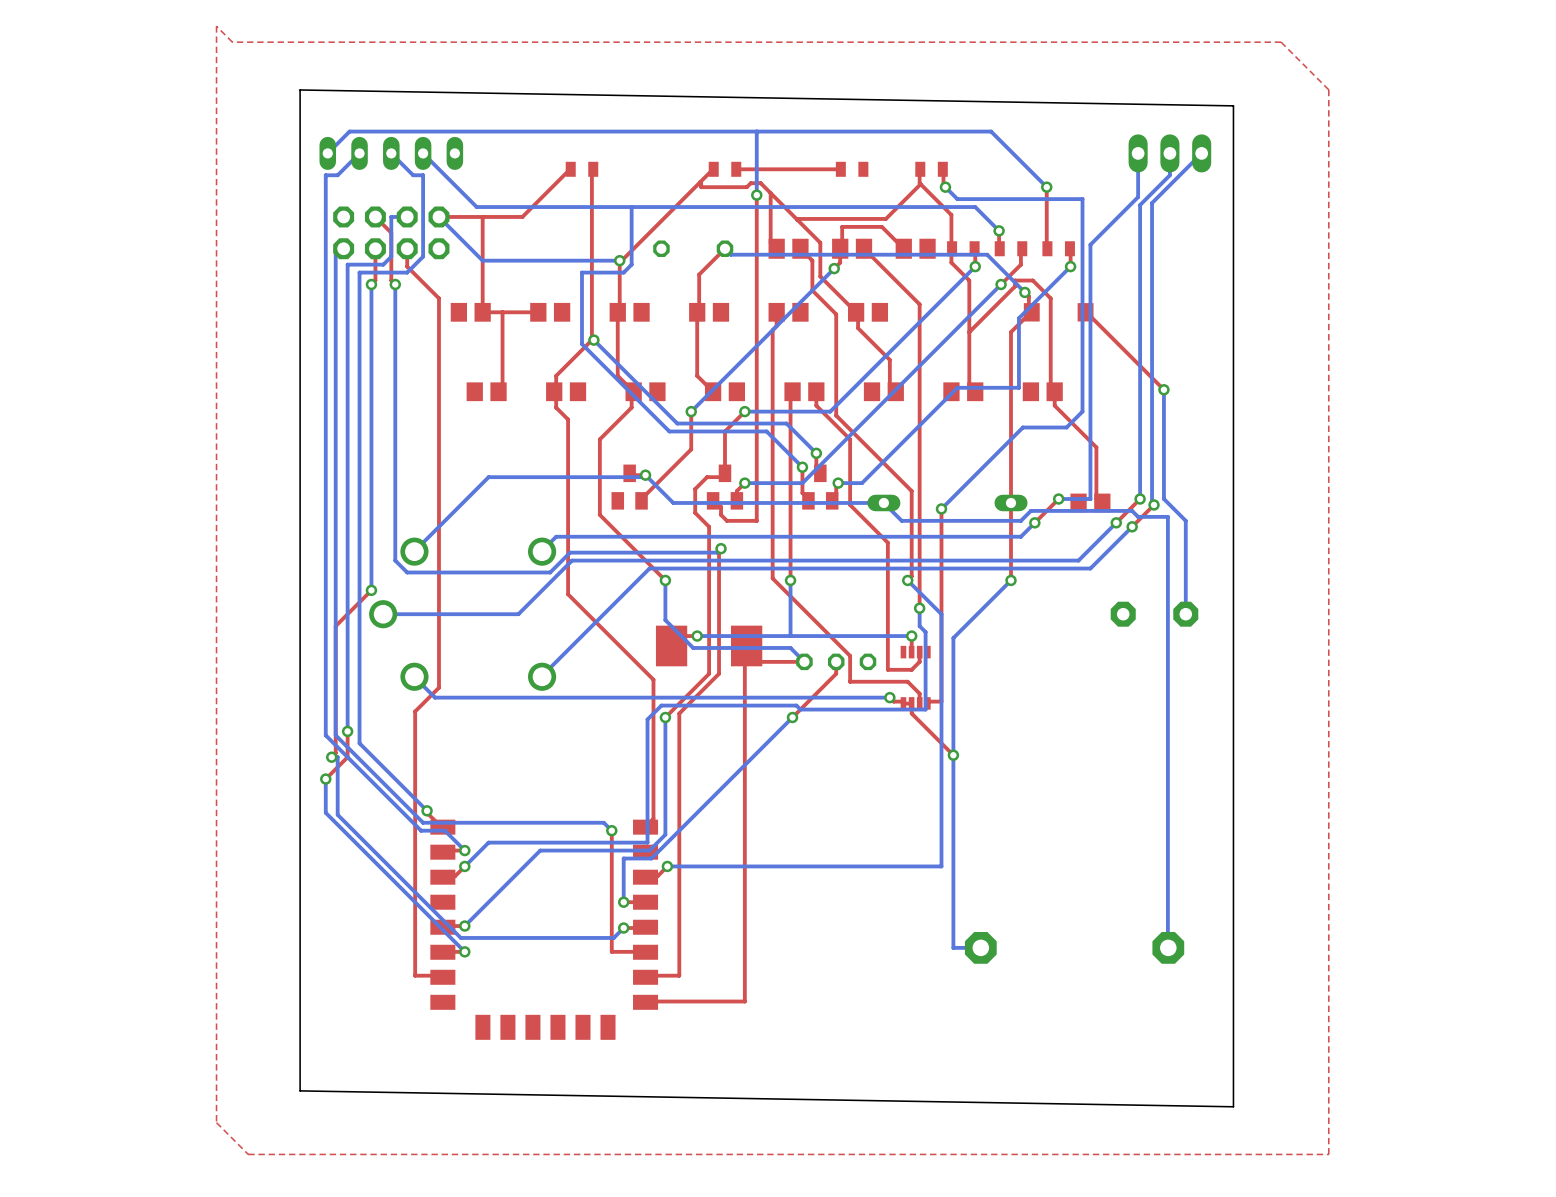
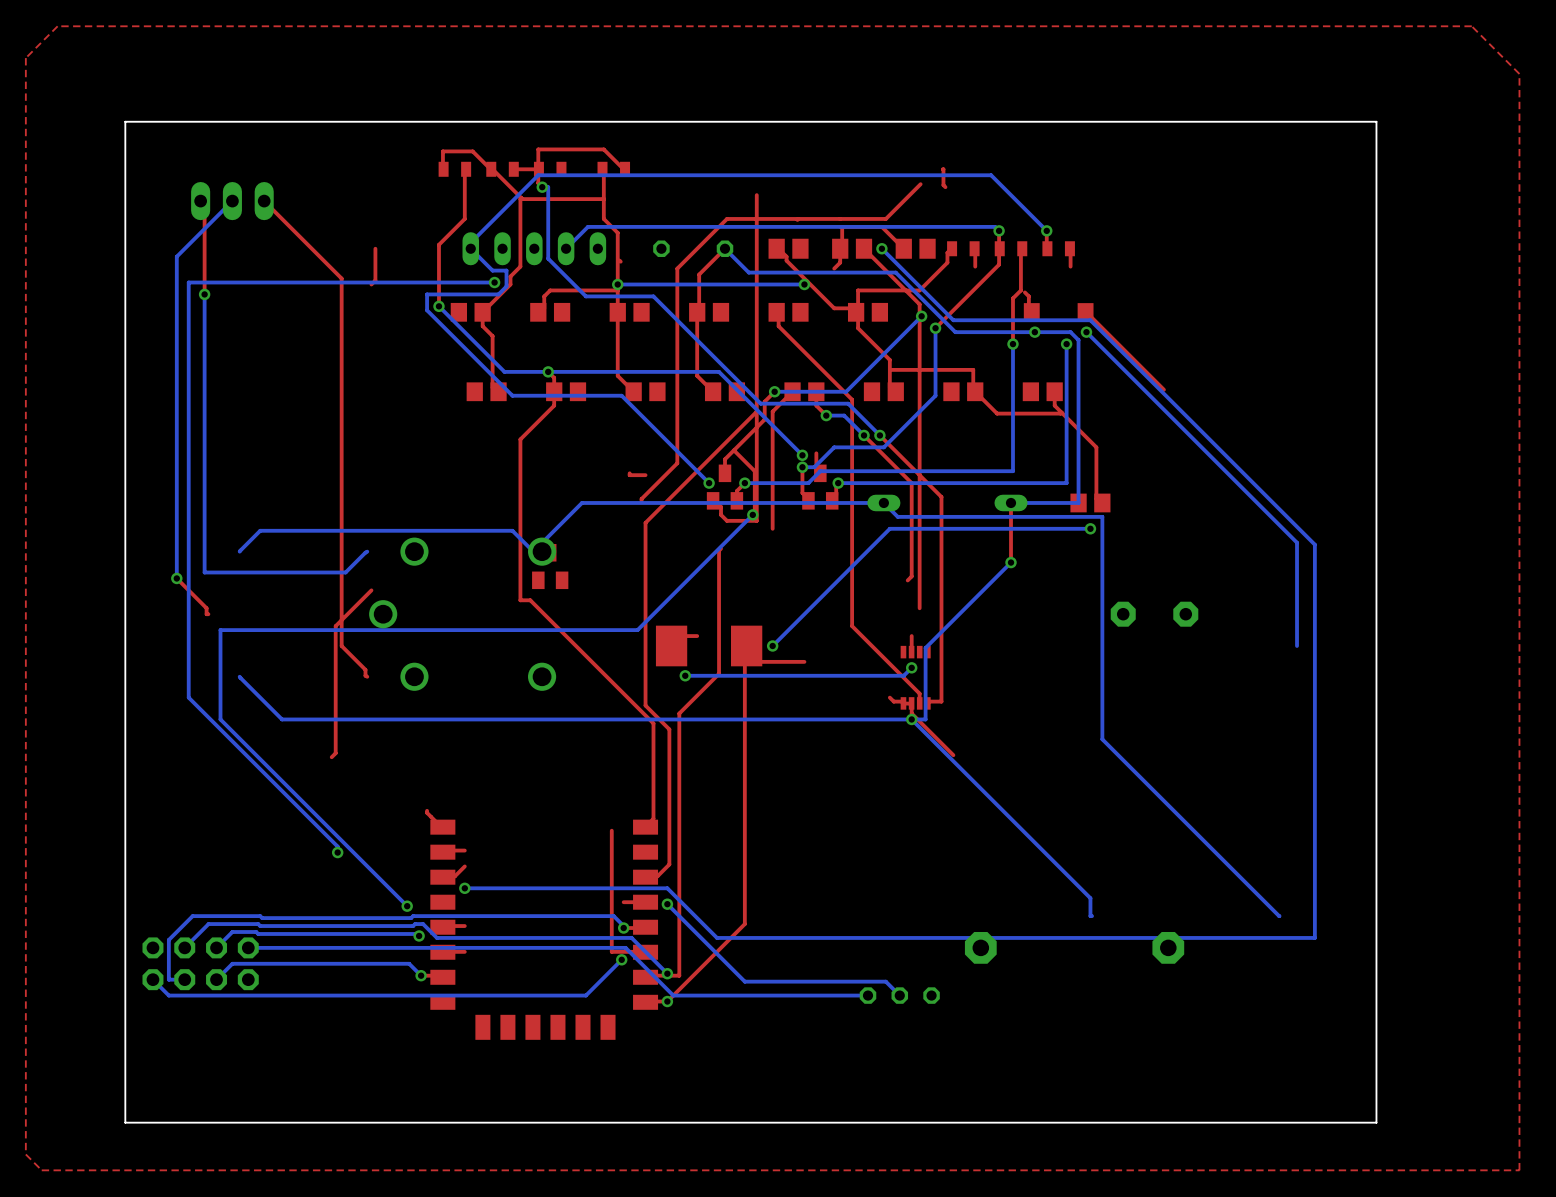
top zone outline: (216, 26) (232, 42) (1281, 42) (1328, 89) (1328, 1154) (248, 1154) (216, 1122) (216, 26) -> (1471, 26) (1519, 73) (1519, 1170) (41, 1170) (25, 1154) (25, 58) (57, 26) (1471, 26)
board edge: (300, 89) (300, 1090) (1233, 1106) (1233, 105) (300, 89) -> (1376, 121) (1376, 1122) (125, 1122) (125, 121) (1376, 121)
bottom track: (756, 131) (756, 195) -> none
bottom track: (327, 153) (349, 131) (991, 131) (1046, 187) -> none
bottom track: (359, 153) (337, 175) (325, 175) (325, 735) (421, 830) (444, 830) (464, 850) -> none
bottom track: (391, 153) (413, 175) (423, 175) (423, 256) (407, 272) (359, 272) (359, 743) (427, 810) -> none
part position: (391, 153) -> (534, 248)
bottom track: (423, 153) (476, 207) (975, 207) (995, 226) -> (566, 248) (587, 226) (995, 226)
bottom track: (1138, 153) (1138, 197) (1090, 244) (1090, 499) (1058, 499) -> none
bottom track: (1169, 153) (1169, 175) (1140, 205) (1140, 499) -> none
part: (1169, 153) -> none
bottom track: (1201, 153) (1152, 203) (1152, 504) (1154, 504) -> none
top track: none -> (443, 169) (442, 151) (472, 151) (522, 199) (603, 199)
part: none -> (454, 169)
part: none -> (502, 169)
top track: none -> (538, 169) (513, 169)
part: none -> (550, 169)
top track: (570, 169) (522, 216) (438, 216) -> none
part: (581, 169) -> none
top track: (593, 169) (591, 340) -> none
part: none -> (613, 169)
top track: none -> (625, 169) (603, 149) (538, 149) (538, 183) (542, 187)
top track: (713, 169) (619, 262) (619, 312) (617, 312) -> (602, 169) (603, 218) (617, 232) (617, 312)
part: (724, 169) -> none
top track: (840, 169) (736, 169) -> none
part: (852, 169) -> none
top track: (920, 169) (919, 183) (951, 214) (951, 262) (969, 280) (969, 387) (973, 391) -> (889, 369) (973, 369) (973, 391)
part: (931, 169) -> none
top track: (700, 182) (701, 187) (746, 187) (750, 183) (760, 183) (820, 242) (820, 276) (856, 312) -> (776, 248) (786, 256) (786, 260) (834, 308) (858, 308) (856, 312)
bottom track: none -> (542, 187) (548, 187) (548, 258) (585, 296) (653, 296) (760, 403) (848, 403) (879, 435)
via: none -> (542, 187)
bottom track: (945, 187) (957, 199) (1082, 199) (1082, 411) (1066, 427) (1022, 427) (941, 508) -> none
via: (945, 187) -> none
top track: (1046, 187) (1046, 230) -> none
via: (1046, 187) -> none
top track: (770, 193) (770, 242) (776, 248) -> none
via: (756, 195) -> none
top track: none -> (200, 201) (204, 205) (204, 294)
bottom track: none -> (232, 201) (176, 256) (176, 578)
part: none -> (232, 201)
top track: none -> (264, 201) (341, 278) (341, 645) (365, 669) (367, 676)
bottom track: (631, 207) (631, 264) (623, 272) (581, 272) (581, 344) (669, 431) (766, 431) (802, 467) -> none
top track: (375, 216) (391, 232) (391, 280) (395, 284) -> none
bottom track: (407, 216) (391, 216) (391, 256) (383, 264) (347, 264) (347, 731) -> none
bottom track: (438, 216) (470, 248) -> (1046, 230) (991, 175) (538, 175) (470, 242) (470, 248)
top track: (482, 216) (482, 312) (538, 312) -> (617, 290) (550, 290) (544, 296) (544, 308) (538, 312)
via: none -> (1046, 230)
part: (391, 232) -> none
bottom track: (343, 248) (335, 248) (335, 735) (423, 822) (603, 822) (611, 830) -> none
top track: (407, 248) (407, 266) (438, 298) -> (466, 169) (464, 218) (438, 244) (438, 298)
top track: (800, 248) (812, 260) (812, 290) (836, 314) (836, 415) (911, 491) -> (864, 435) (911, 483) (911, 491)
bottom track: none -> (881, 248) (953, 320) (1090, 320) (1314, 544) (1314, 937) (717, 937) (667, 888) (464, 888)
via: none -> (881, 248)
top track: none -> (951, 248) (947, 252) (947, 262) (919, 290) (858, 290) (858, 312)
top track: none -> (999, 248) (999, 264) (935, 328)
bottom track: (730, 254) (987, 254) (1024, 292) -> (730, 254) (748, 272) (895, 272) (955, 332) (1070, 332) (1078, 340) (1078, 502) (1011, 502)
bottom track: (619, 260) (482, 260) -> (709, 483) (621, 395) (512, 395) (427, 310) (427, 294) (498, 294) (506, 286) (506, 270) (492, 270) (482, 260)
via position: (619, 260) -> (617, 284)
top track: (1020, 264) (1001, 284) -> (1020, 264) (1020, 290) (1012, 298) (1012, 344)
bottom track: (975, 266) (830, 411) (744, 411) -> none
via: (975, 266) -> none
bottom track: (1070, 266) (1018, 318) (1018, 387) (957, 387) (862, 483) -> (1066, 344) (1066, 483) (862, 483)
via: (1070, 266) -> none
bottom track: (834, 268) (691, 411) -> none
via: (834, 268) -> none
bottom track: none -> (494, 282) (188, 282) (188, 697) (337, 846) (337, 852)
via: none -> (494, 282)
bottom track: (371, 284) (371, 590) -> none
via: (371, 284) -> none
bottom track: (395, 284) (395, 560) (407, 572) (550, 572) (570, 552) (717, 552) (721, 548) -> none
via: (395, 284) -> none
bottom track: none -> (804, 284) (617, 284)
via: none -> (804, 284)
bottom track: (1001, 284) (802, 483) -> (1012, 344) (1012, 471) (820, 471) (808, 483) (802, 483)
via: (1001, 284) -> none
via: (1024, 292) -> none
bottom track: none -> (204, 294) (204, 572) (345, 572) (367, 551)
via: none -> (204, 294)
top track: (438, 306) (438, 687) (415, 711) (415, 975) (421, 975) -> none
bottom track: none -> (438, 306) (504, 371) (719, 371) (802, 455)
via: none -> (438, 306)
top track: (502, 312) (502, 387) (498, 391) -> (521, 198) (520, 266) (510, 276) (510, 284) (482, 312) (482, 326) (492, 336) (492, 387) (498, 391)
top track: (776, 312) (776, 326) (772, 330) (772, 411) -> (792, 391) (772, 411)
top track: (1030, 312) (1011, 332) (1011, 502) -> none
bottom track: none -> (921, 316) (846, 391) (774, 391)
via: none -> (921, 316)
bottom track: none -> (935, 328) (935, 395) (883, 447) (834, 447) (814, 467) (806, 467) (802, 471)
via: none -> (935, 328)
top track: (969, 332) (1014, 286) (1014, 280) (1032, 280) (1050, 298) (1050, 389) (1054, 391) -> none
via: none -> (1034, 332)
bottom track: none -> (1086, 332) (1297, 542) (1297, 645)
via: none -> (1086, 332)
top track: (591, 340) (556, 375) (556, 407) (568, 419) (568, 594) (653, 679) (653, 723) -> (548, 371) (554, 377) (554, 405) (520, 439) (520, 600) (530, 600) (653, 723)
bottom track: (593, 340) (677, 423) (786, 423) (816, 453) -> none
via: (593, 340) -> none
via: none -> (1012, 344)
via: none -> (1066, 344)
via: none -> (548, 371)
bottom track: (1163, 389) (1163, 499) (1185, 520) (1185, 614) -> none
via: (1163, 389) -> none
top track: (633, 391) (631, 391) (631, 407) (599, 439) (599, 514) (665, 580) -> none
top track: (792, 391) (790, 393) (790, 580) -> none
top track: none -> (975, 391) (997, 413) (1061, 412)
top track: (691, 411) (691, 449) (677, 463) -> (798, 218) (726, 218) (677, 268) (677, 463)
via: (691, 411) -> none
top track: (744, 411) (724, 431) (724, 459) -> (774, 391) (764, 401) (764, 419) (724, 459)
via position: (744, 411) -> (774, 391)
top track: none -> (756, 411) (645, 522) (645, 705) (669, 729) (669, 864) (667, 866)
top track: (826, 415) (850, 439) (850, 504) (887, 542) (887, 669) (911, 669) (919, 661) (919, 652) -> none
bottom track: none -> (826, 415) (844, 415) (864, 435)
via: none -> (826, 415)
via: none -> (864, 435)
top track: none -> (879, 435) (941, 497) (941, 508)
via: none -> (879, 435)
top track: none -> (733, 450) (754, 471) (754, 512) (752, 514)
via position: (816, 453) -> (802, 455)
top track: (724, 473) (724, 477) (707, 477) (695, 489) (695, 512) (709, 526) (709, 673) (665, 717) -> none
via: (645, 475) -> none
via: none -> (709, 483)
part position: (629, 487) -> (550, 566)
top track: (1058, 499) (1034, 522) -> none
via: (1058, 499) -> none
top track: (1140, 499) (1116, 522) -> none
via: (1140, 499) -> none
bottom track: (673, 502) (645, 475) (645, 477) (488, 477) (414, 551) -> (673, 502) (581, 502) (534, 552) (512, 530) (260, 530) (239, 551)
bottom track: (883, 502) (901, 520) (1020, 520) (1030, 510) (1132, 510) (1138, 516) (1167, 516) (1168, 947) -> (883, 502) (897, 516) (1102, 516) (1102, 739) (1279, 916)
top track: (1154, 504) (1132, 526) -> none
via: (1154, 504) -> none
via: (941, 508) -> none
bottom track: none -> (752, 514) (637, 630) (220, 630) (220, 719) (407, 906)
via: none -> (752, 514)
bottom track: (1034, 522) (1020, 536) (556, 536) (542, 551) -> none
via: (1034, 522) -> none
bottom track: (1116, 522) (1078, 560) (572, 560) (518, 614) (383, 614) -> none
via: (1116, 522) -> none
bottom track: (1132, 526) (1090, 568) (649, 568) (542, 676) -> none
via: (1132, 526) -> none
top track: (772, 528) (772, 578) (850, 655) (850, 681) (907, 681) -> (776, 312) (778, 312) (778, 326) (852, 399) (852, 626) (907, 681)
bottom track: none -> (1090, 528) (889, 528) (772, 645)
via: none -> (1090, 528)
via: (721, 548) -> none
top track: (1011, 562) (1011, 580) -> none
top track: none -> (176, 578) (206, 608) (206, 614) (208, 614)
via: none -> (176, 578)
bottom track: (665, 580) (665, 620) (693, 647) (790, 647) (804, 661) -> none
via: (665, 580) -> none
bottom track: (790, 580) (790, 636) -> none
via: (790, 580) -> none
bottom track: (907, 580) (941, 614) (941, 866) (667, 866) -> none
via: (907, 580) -> none
bottom track: (1011, 580) (953, 638) (953, 947) (980, 947) -> none
via position: (1011, 580) -> (1011, 562)
via: (371, 590) -> none
bottom track: (919, 608) (919, 626) (925, 632) (925, 647) -> (1011, 562) (925, 647)
via: (919, 608) -> none
via: (697, 636) -> none
bottom track: (911, 636) (697, 636) -> none
via: (911, 636) -> none
via: none -> (772, 645)
top track: (836, 661) (836, 673) (792, 717) -> none
part: (836, 661) -> none
bottom track: none -> (911, 667) (903, 675) (685, 675)
via: none -> (911, 667)
via: none -> (685, 675)
bottom track: (414, 676) (435, 697) (889, 697) -> none
via: (889, 697) -> none
bottom track: (925, 709) (800, 709) (796, 705) (661, 705) (647, 719) (647, 842) (488, 842) (464, 866) -> (925, 709) (925, 719) (282, 719) (239, 676)
bottom track: (665, 717) (665, 834) (649, 850) (540, 850) (464, 926) -> none
via: (665, 717) -> none
bottom track: (792, 717) (651, 858) (623, 858) (623, 902) -> none
via: (792, 717) -> none
bottom track: none -> (911, 719) (1090, 898) (1090, 916) (1092, 916)
via: none -> (911, 719)
top track: (347, 731) (347, 757) (325, 779) -> none
via: (347, 731) -> none
via: (953, 755) -> none
bottom track: (331, 757) (337, 757) (337, 814) (460, 937) -> (184, 947) (208, 924) (258, 924) (260, 926) (413, 926) (415, 924) (423, 924) (436, 937) (460, 937)
via: (331, 757) -> none
bottom track: (325, 779) (325, 812) (464, 951) -> none
via: (325, 779) -> none
via: (427, 810) -> none
via: (611, 830) -> none
via: (464, 850) -> none
via: none -> (337, 852)
via: (464, 866) -> none
via: (667, 866) -> none
via: none -> (464, 888)
via: (623, 902) -> none
bottom track: none -> (667, 904) (744, 981) (885, 981) (899, 995)
via: none -> (667, 904)
via: none -> (407, 906)
top track: (744, 924) (744, 1001) (667, 1001) -> (744, 924) (667, 1001)
via: (464, 926) -> none
bottom track: none -> (623, 926) (613, 916) (413, 916) (411, 918) (192, 916) (168, 939) (168, 979) (184, 979)
bottom track: (623, 928) (613, 937) -> (667, 973) (631, 937) (613, 937)
bottom track: none -> (419, 935) (417, 933) (258, 933) (256, 931) (232, 931) (216, 947)
via: none -> (419, 935)
bottom track: none -> (248, 947) (625, 947) (673, 995) (868, 995)
via: (464, 951) -> none
bottom track: none -> (621, 959) (585, 995) (168, 995) (152, 979)
via: none -> (621, 959)
part: none -> (200, 963)
via: none -> (667, 973)
bottom track: none -> (421, 975) (409, 963) (232, 963) (216, 979)
via: none -> (421, 975)
part: none -> (899, 995)
via: none -> (667, 1001)

